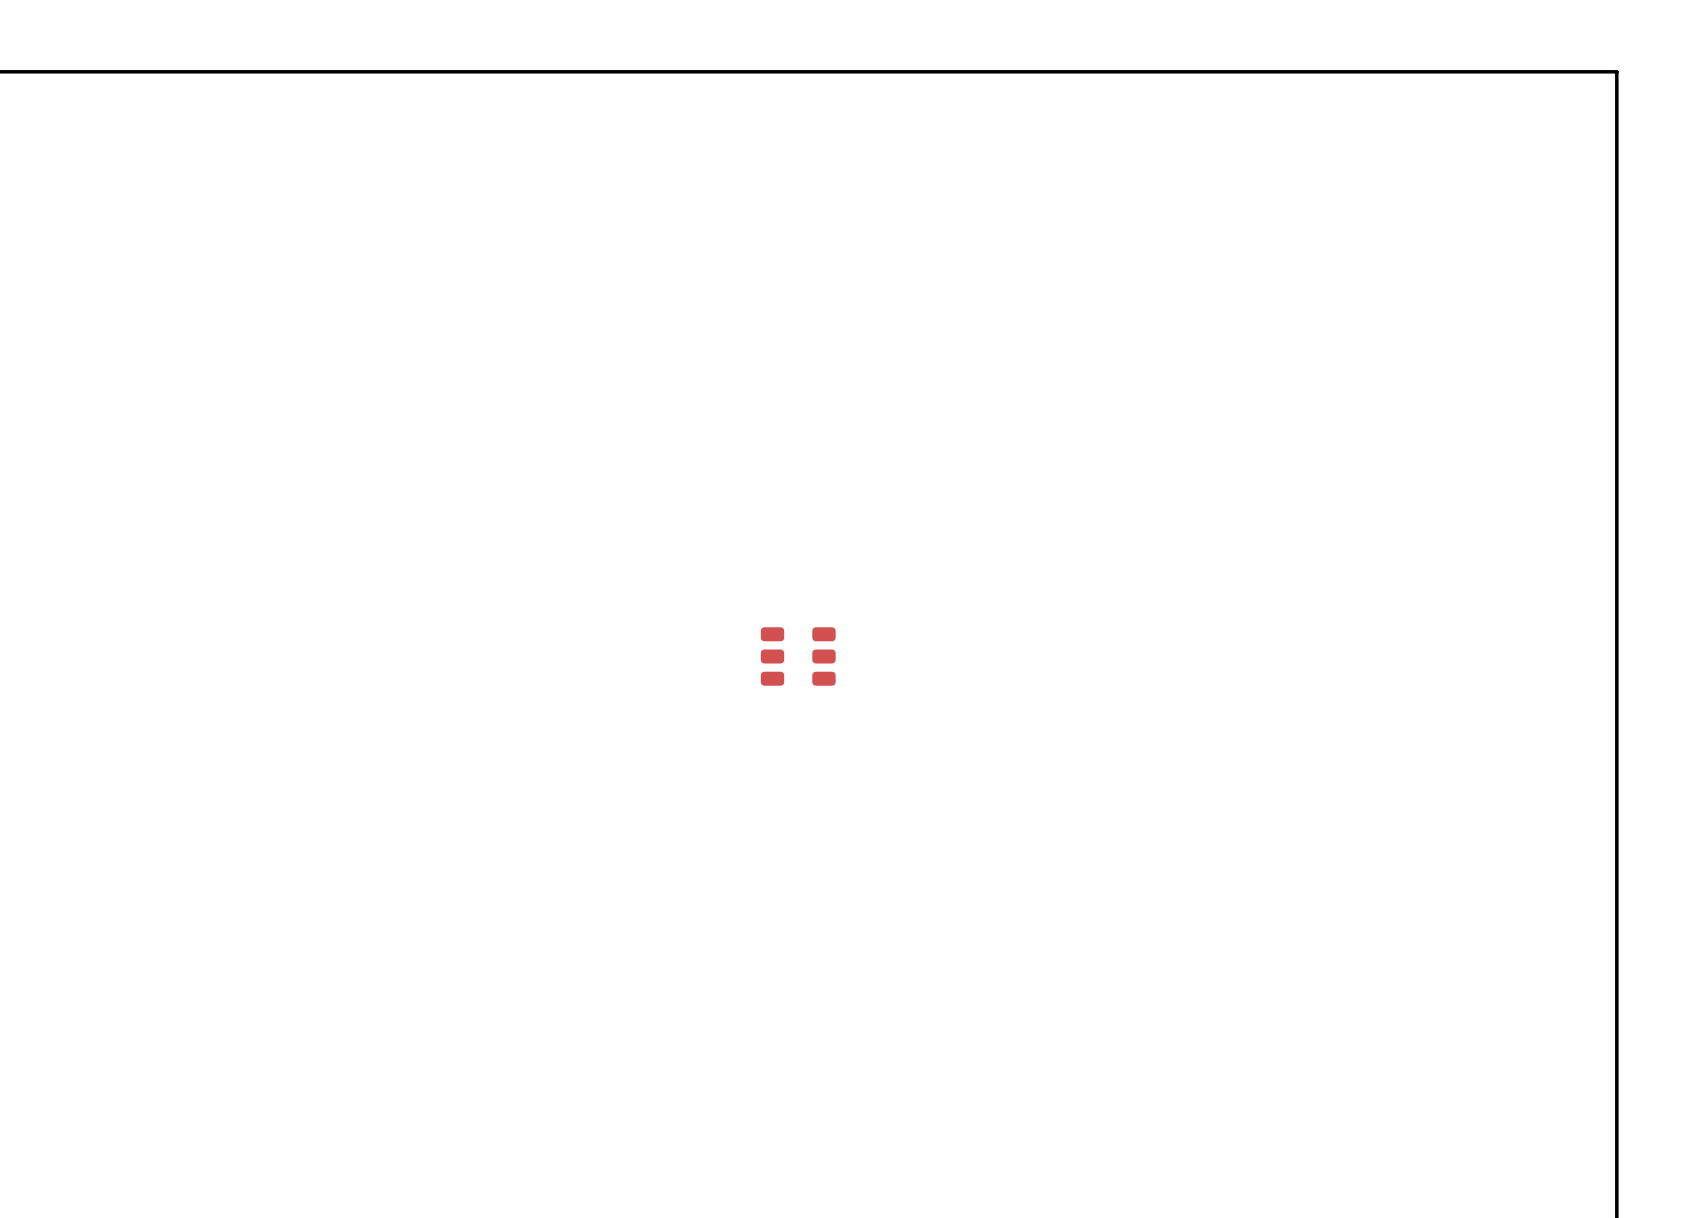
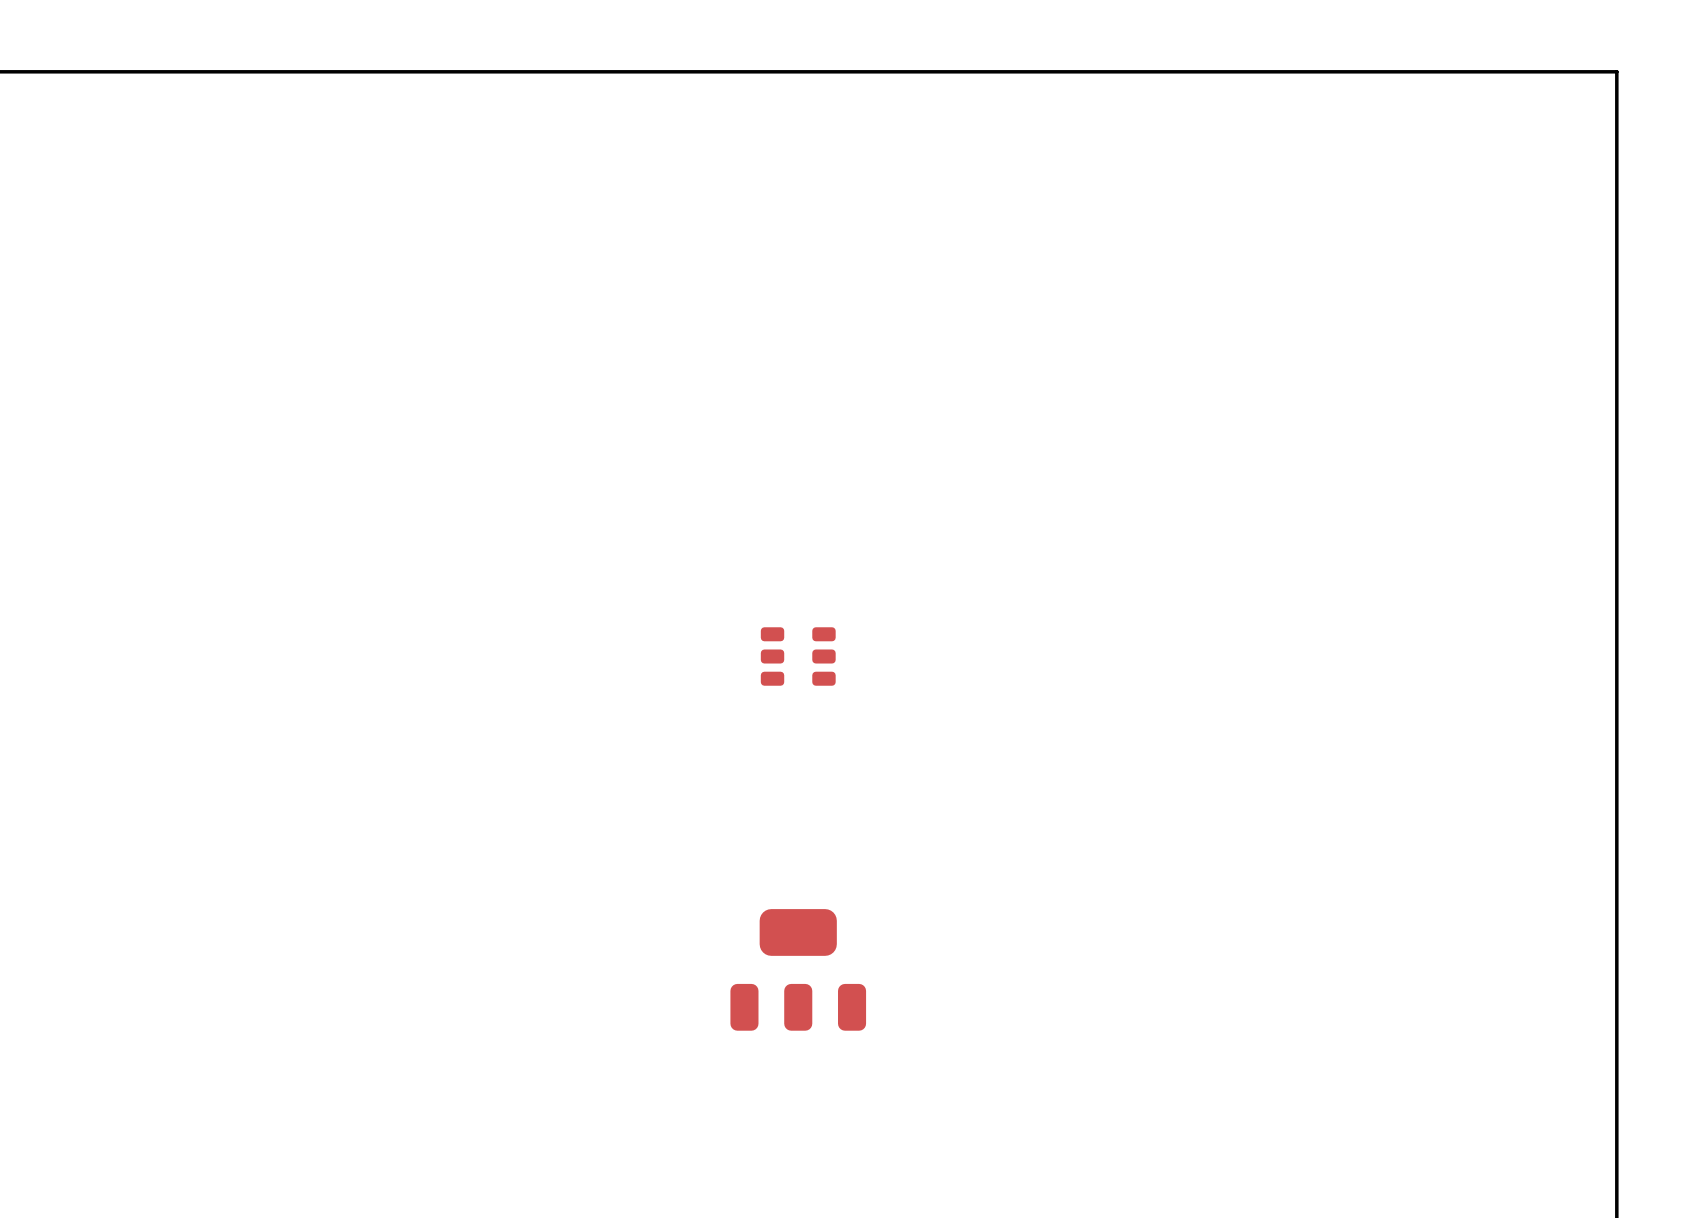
part: none -> (798, 969)

